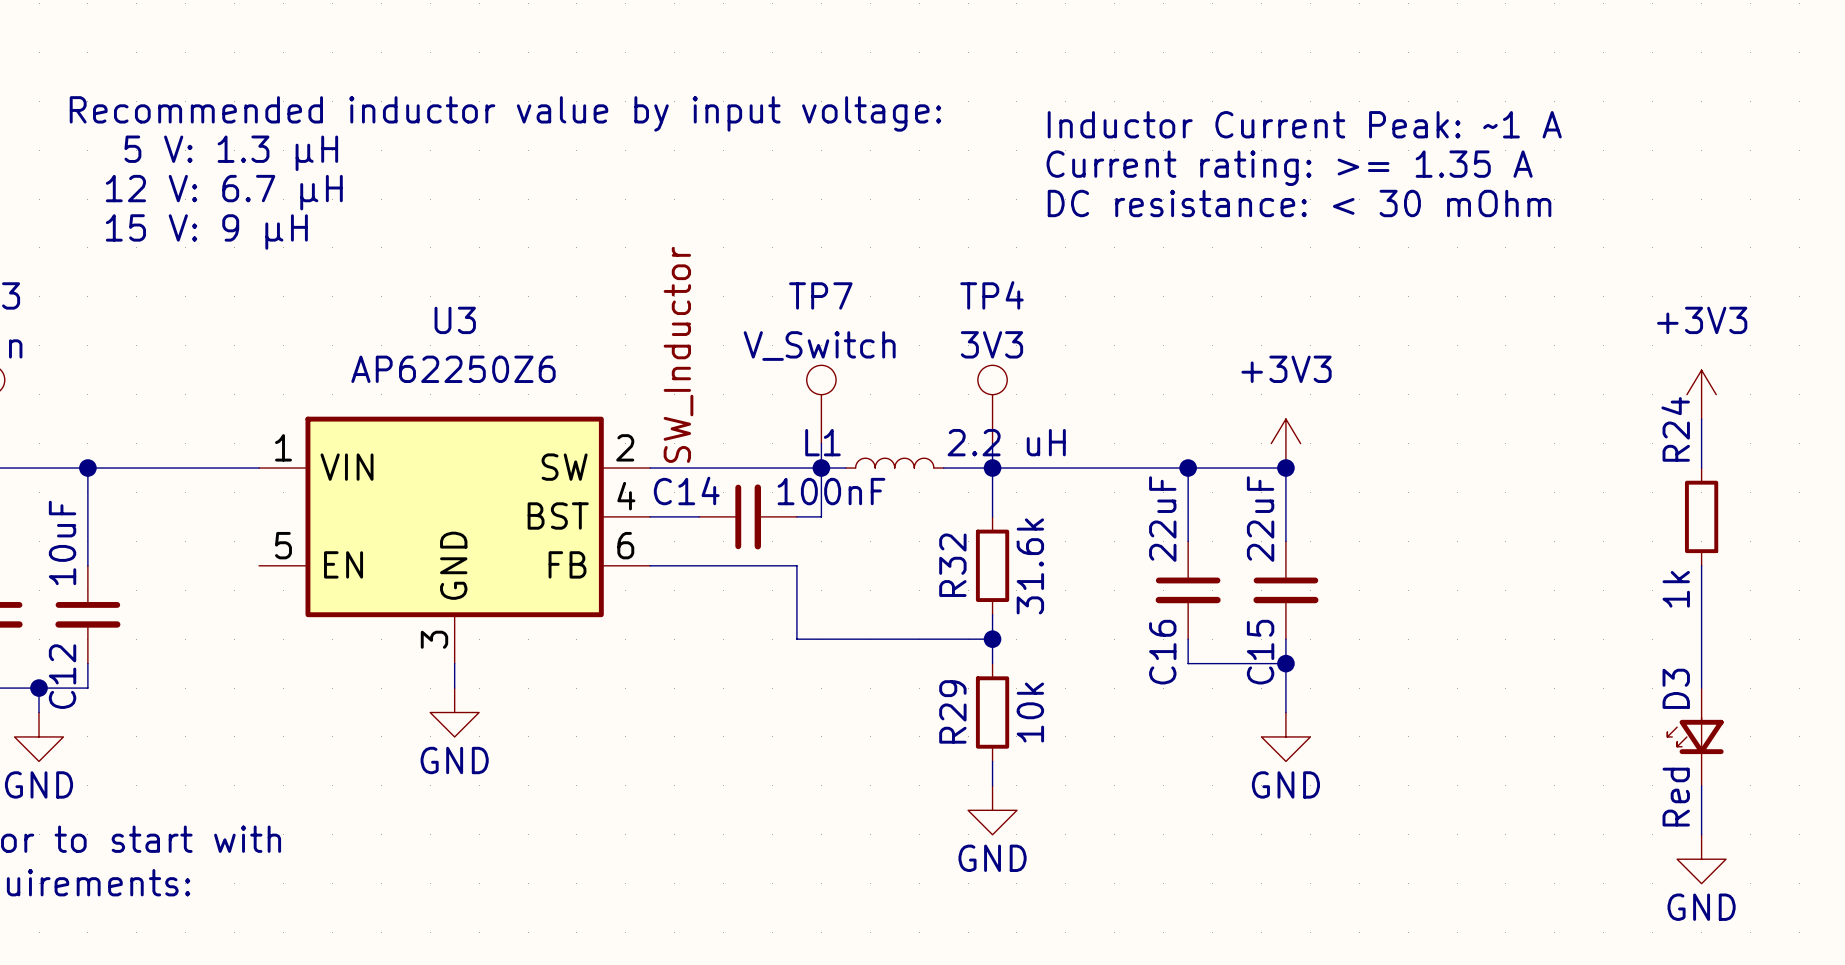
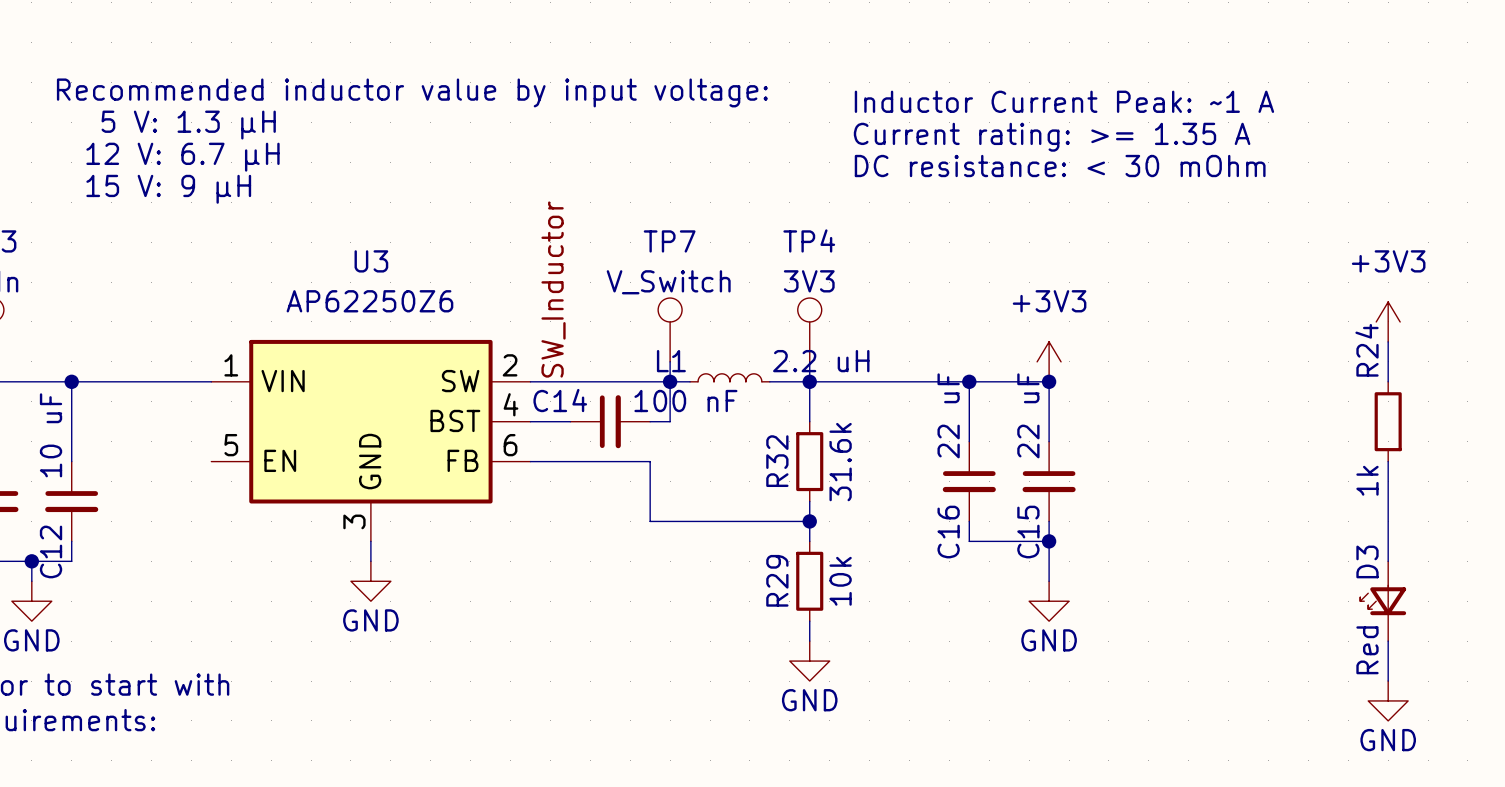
C14 value: 100nF (831, 491) -> 100 nF (685, 401)
C16 value: 22uF (1162, 519) -> 22 uF (948, 415)
C15 value: 22uF (1260, 519) -> 22 uF (1028, 415)
C12 value: 10uF (62, 542) -> 10 uF (51, 435)

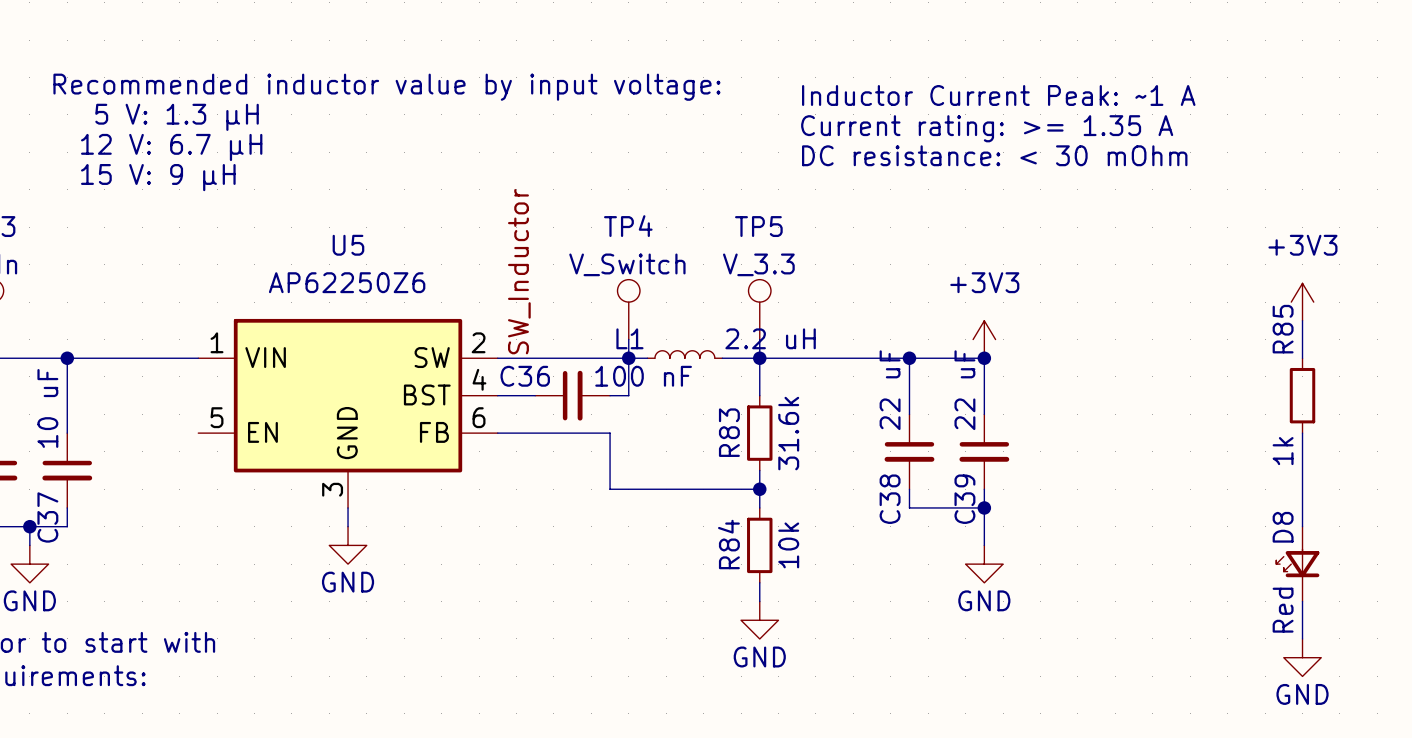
TP4 name: TP4 (809, 240) -> TP5 (758, 226)
TP7 name: TP7 (669, 241) -> TP4 (628, 226)
U3 name: U3 (371, 261) -> U5 (348, 245)
TP4 value: 3V3 (809, 281) -> V_3.3 (758, 264)
R24 name: R24 (1367, 350) -> R85 (1283, 329)
C14 name: C14 (560, 400) -> C36 (525, 376)
R32 name: R32 (777, 461) -> R83 (729, 432)
C16 name: C16 (948, 532) -> C38 (890, 499)
C15 name: C15 (1028, 532) -> C39 (964, 499)
C12 name: C12 (51, 551) -> C37 (47, 517)
D3 name: D3 (1367, 561) -> D8 (1283, 527)
R29 name: R29 (777, 580) -> R84 (728, 544)

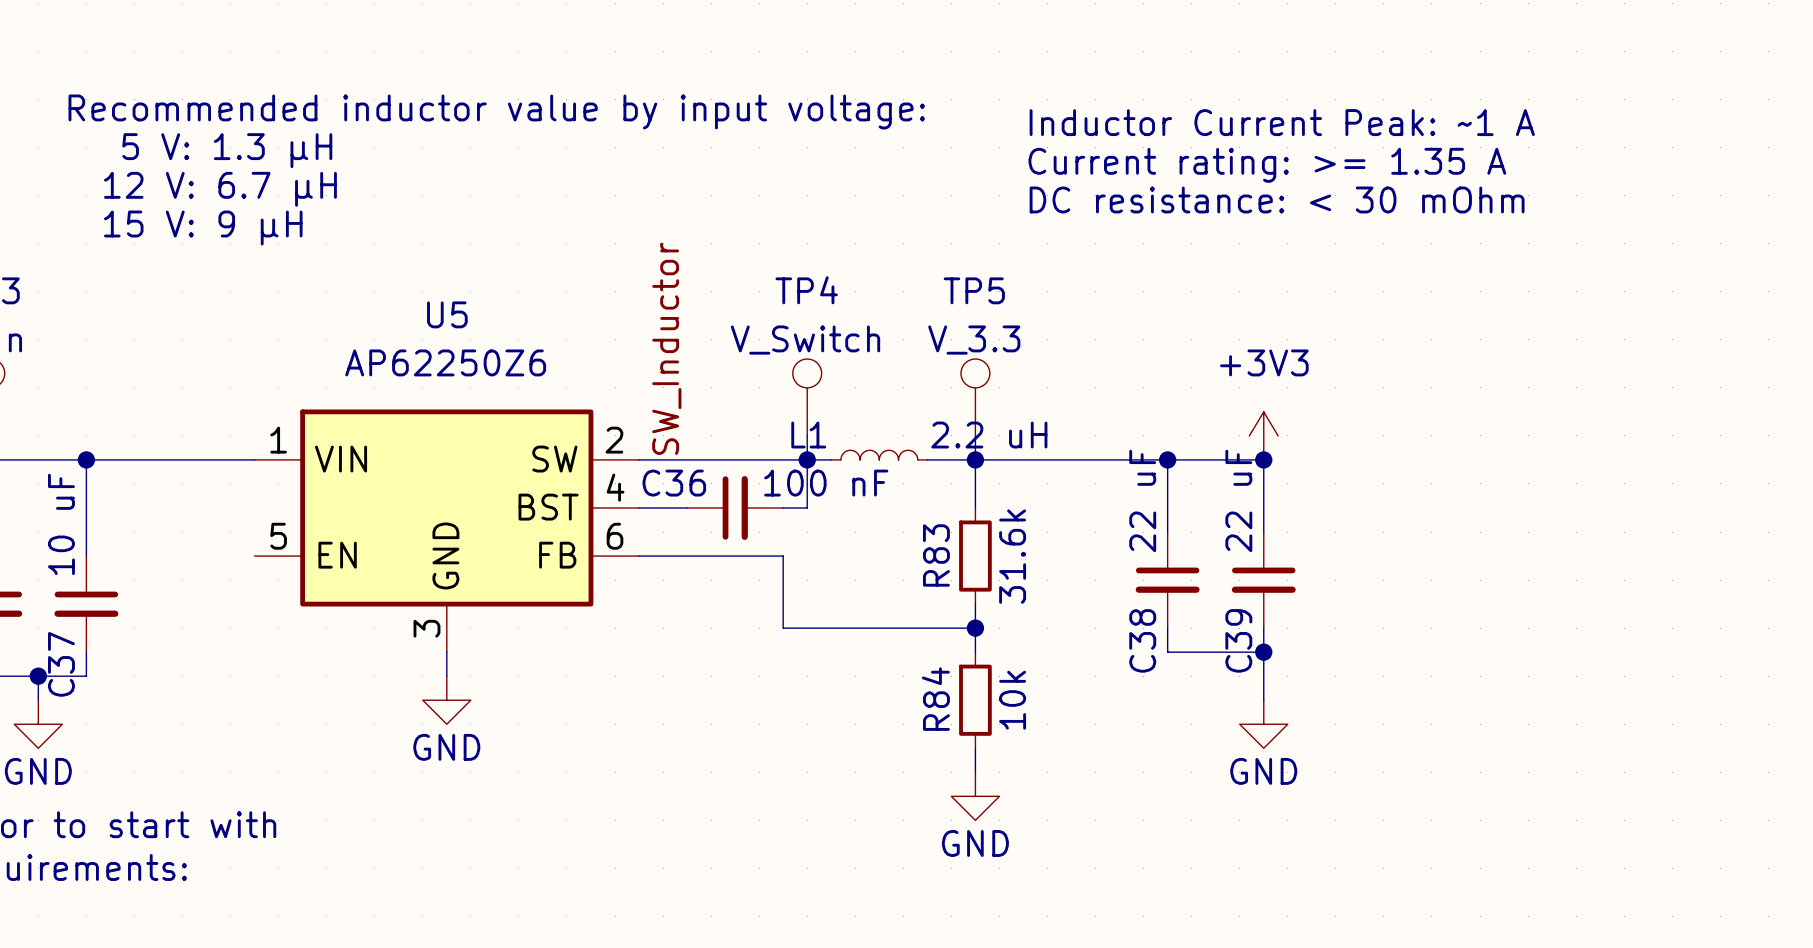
power symbol: +3V3 (1302, 302) -> none
wire: (1302, 320) (1302, 358) -> none
R85: 1k (1302, 395) -> none
wire: (1302, 433) (1302, 526) -> none
D8: Red (1297, 564) -> none
wire: (1302, 601) (1302, 638) -> none
power symbol: GND (1302, 657) -> none

